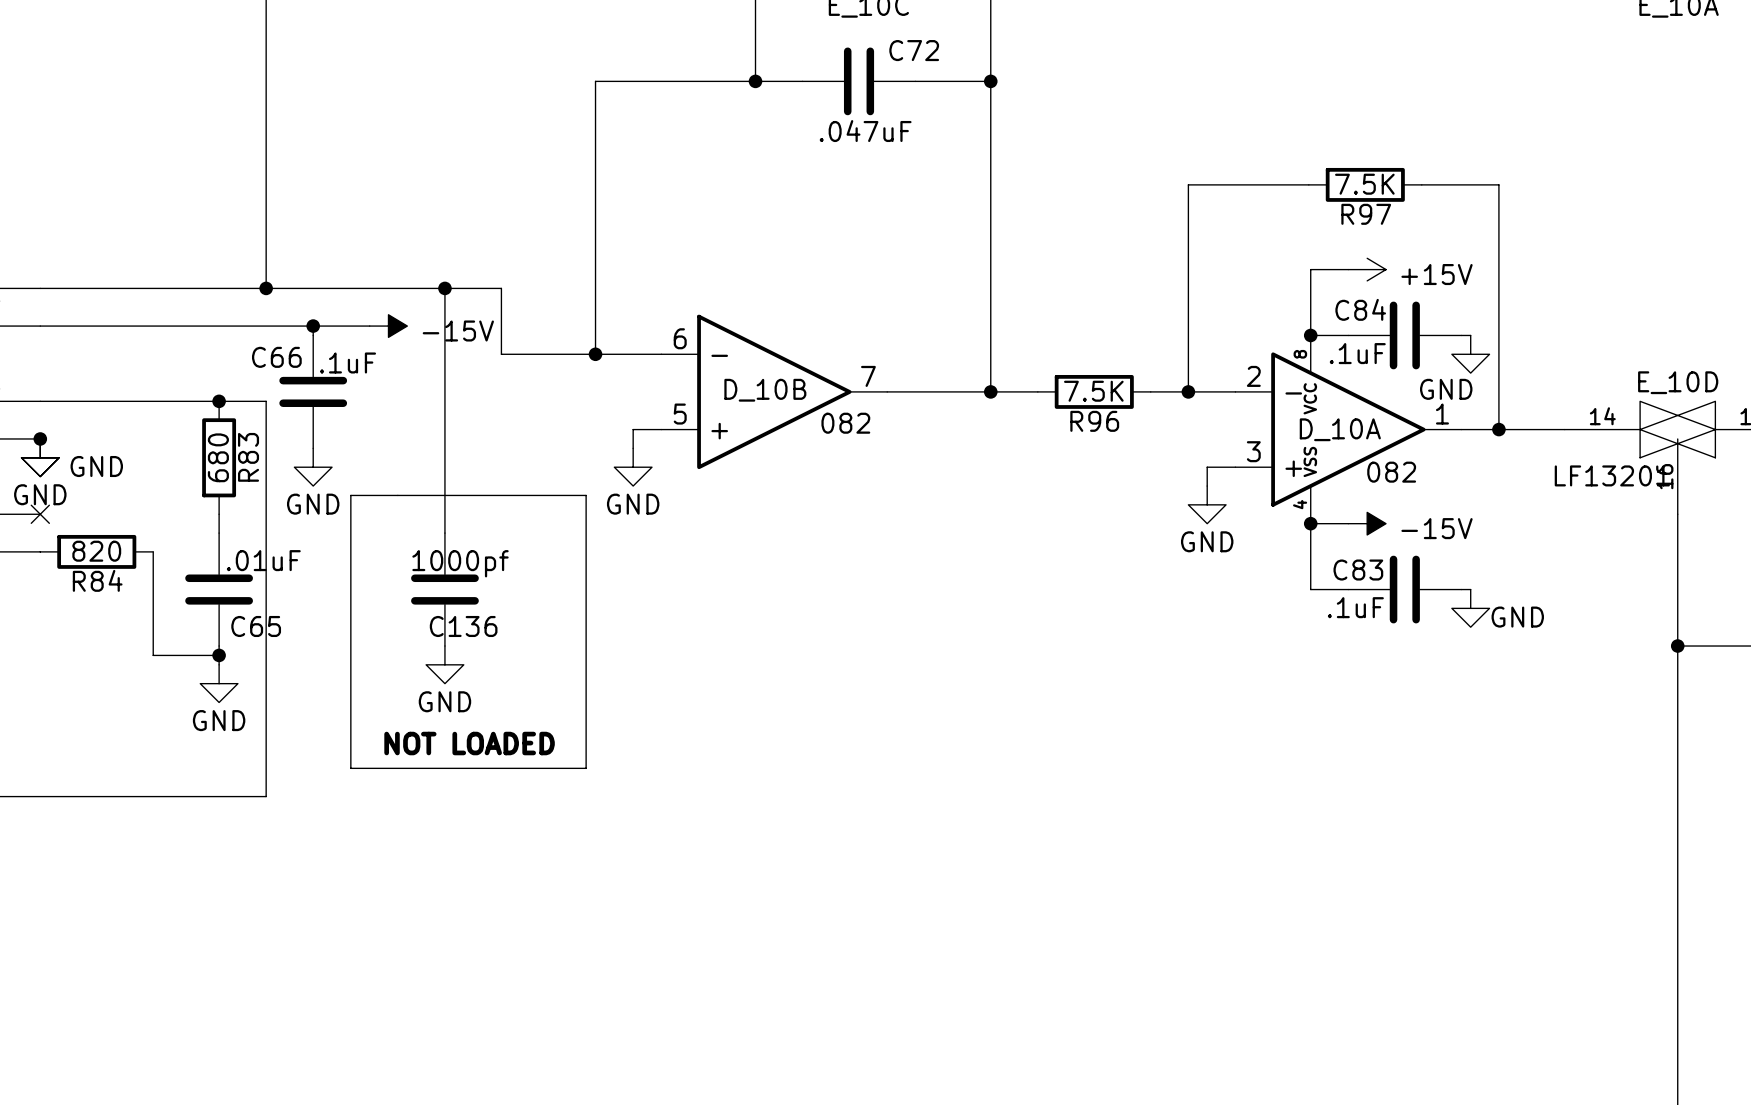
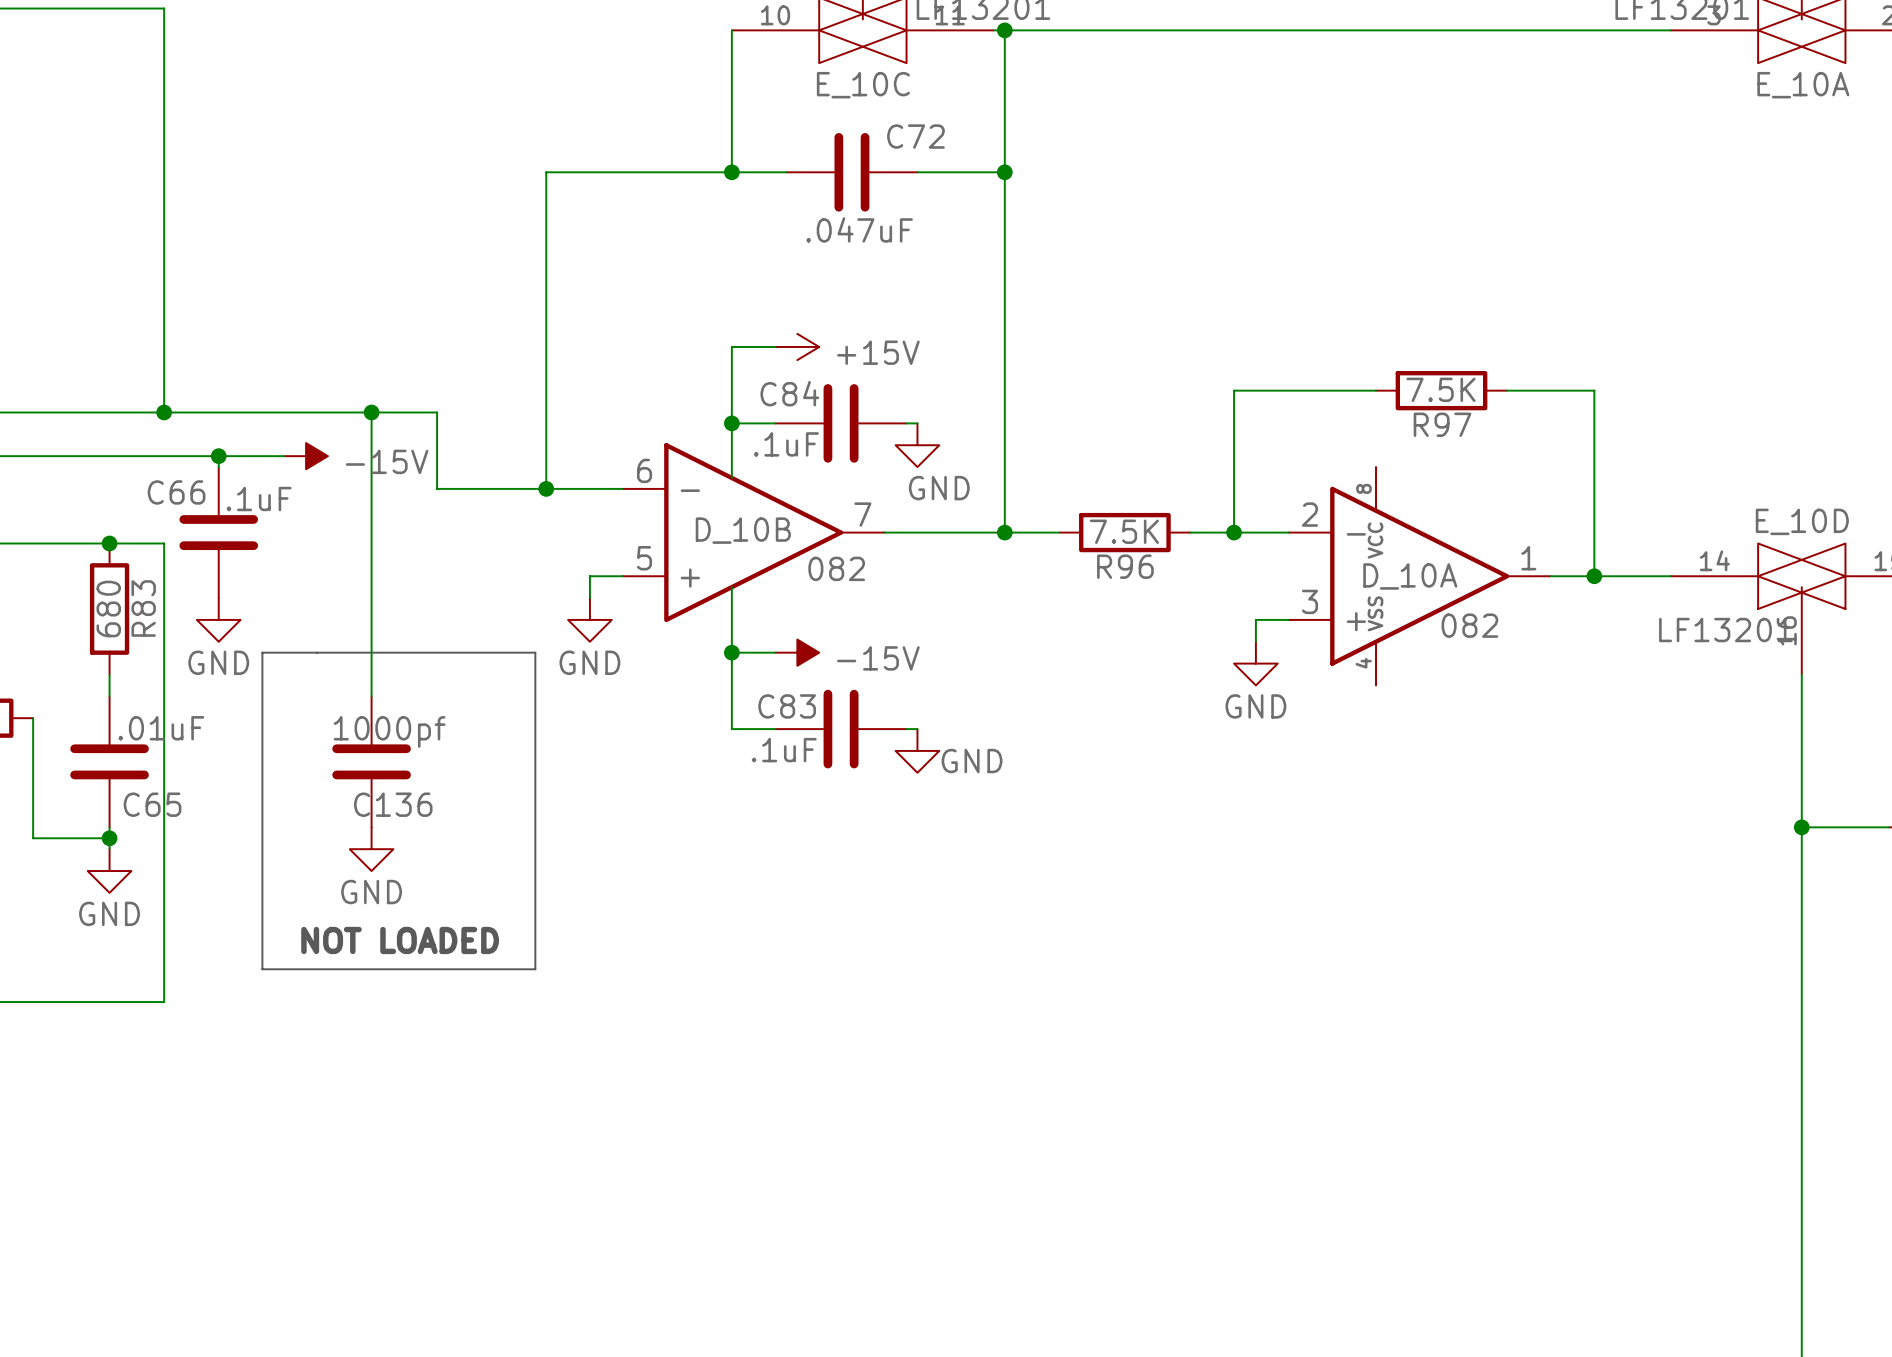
wire: (1308, 184) (1188, 184) (1188, 269) -> (1376, 390) (1234, 390)
R97 position: (1365, 184) -> (1441, 390)
wire: (1421, 184) (1498, 184) (1498, 269) -> (1507, 390) (1594, 390)
wire: none -> (775, 346) (731, 346) (731, 477)
power symbol: none -> +15V (797, 346)
wire: (1348, 269) (1310, 269) (1310, 335) (1348, 335) -> none
power symbol: +15V (1367, 269) -> none
wire: none -> (731, 423) (775, 423)
junction: none -> (731, 423)
wire: none -> (906, 423) (917, 423)
power symbol: none -> GND (917, 445)
junction: (1310, 335) -> none
C84 position: (1404, 335) -> (841, 423)
wire: (1461, 335) (1470, 335) -> none
power symbol: GND (1470, 354) -> none
wire: none -> (731, 587) (731, 729) (775, 729)
wire: none -> (731, 652) (775, 652)
junction: none -> (731, 652)
power symbol: none -> -15V (797, 652)
junction: (1310, 523) -> none
wire: (1348, 523) (1310, 523) (1310, 589) (1348, 589) -> none
power symbol: -15V (1367, 523) -> none
wire: none -> (906, 729) (917, 729)
power symbol: none -> GND (917, 750)
C83 position: (1404, 589) -> (841, 729)
wire: (1461, 589) (1470, 589) -> none
power symbol: GND (1470, 608) -> none

